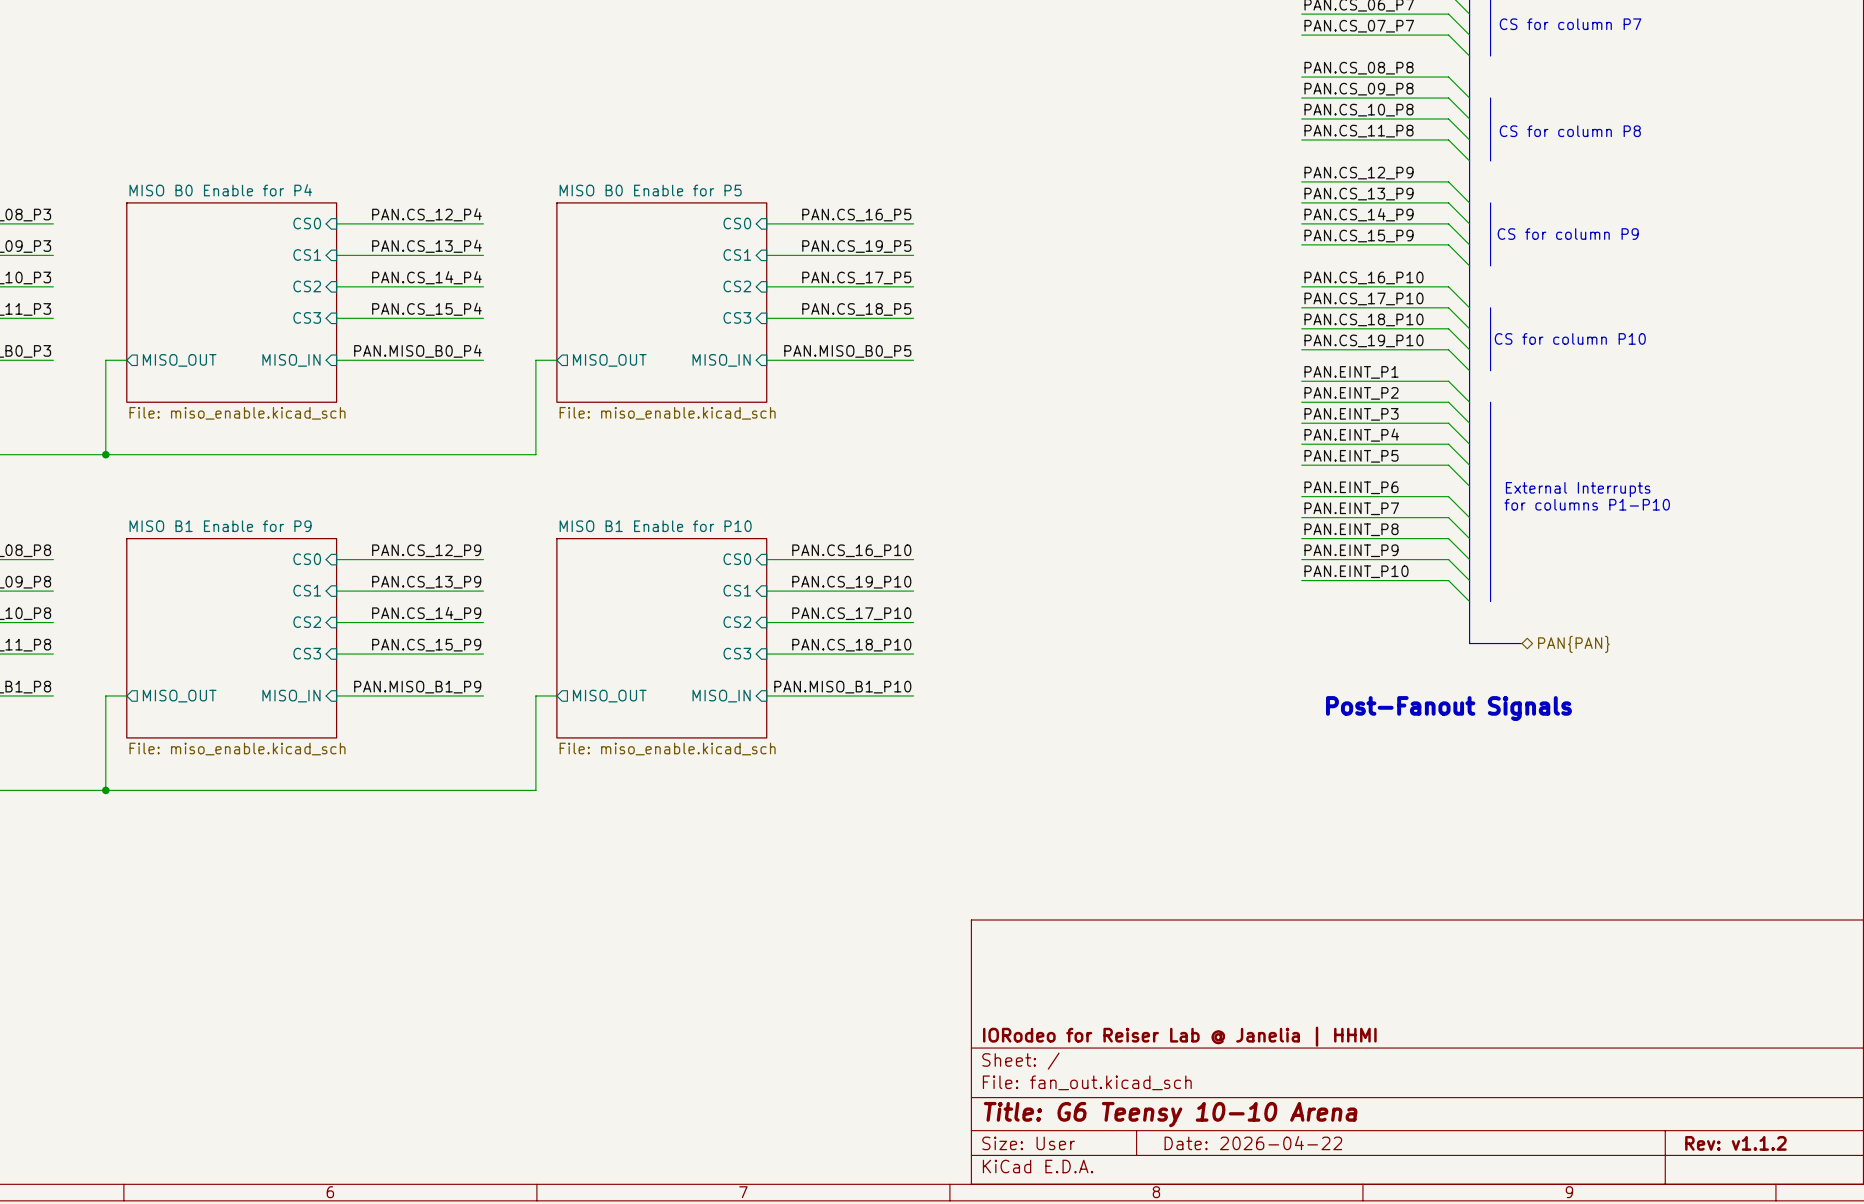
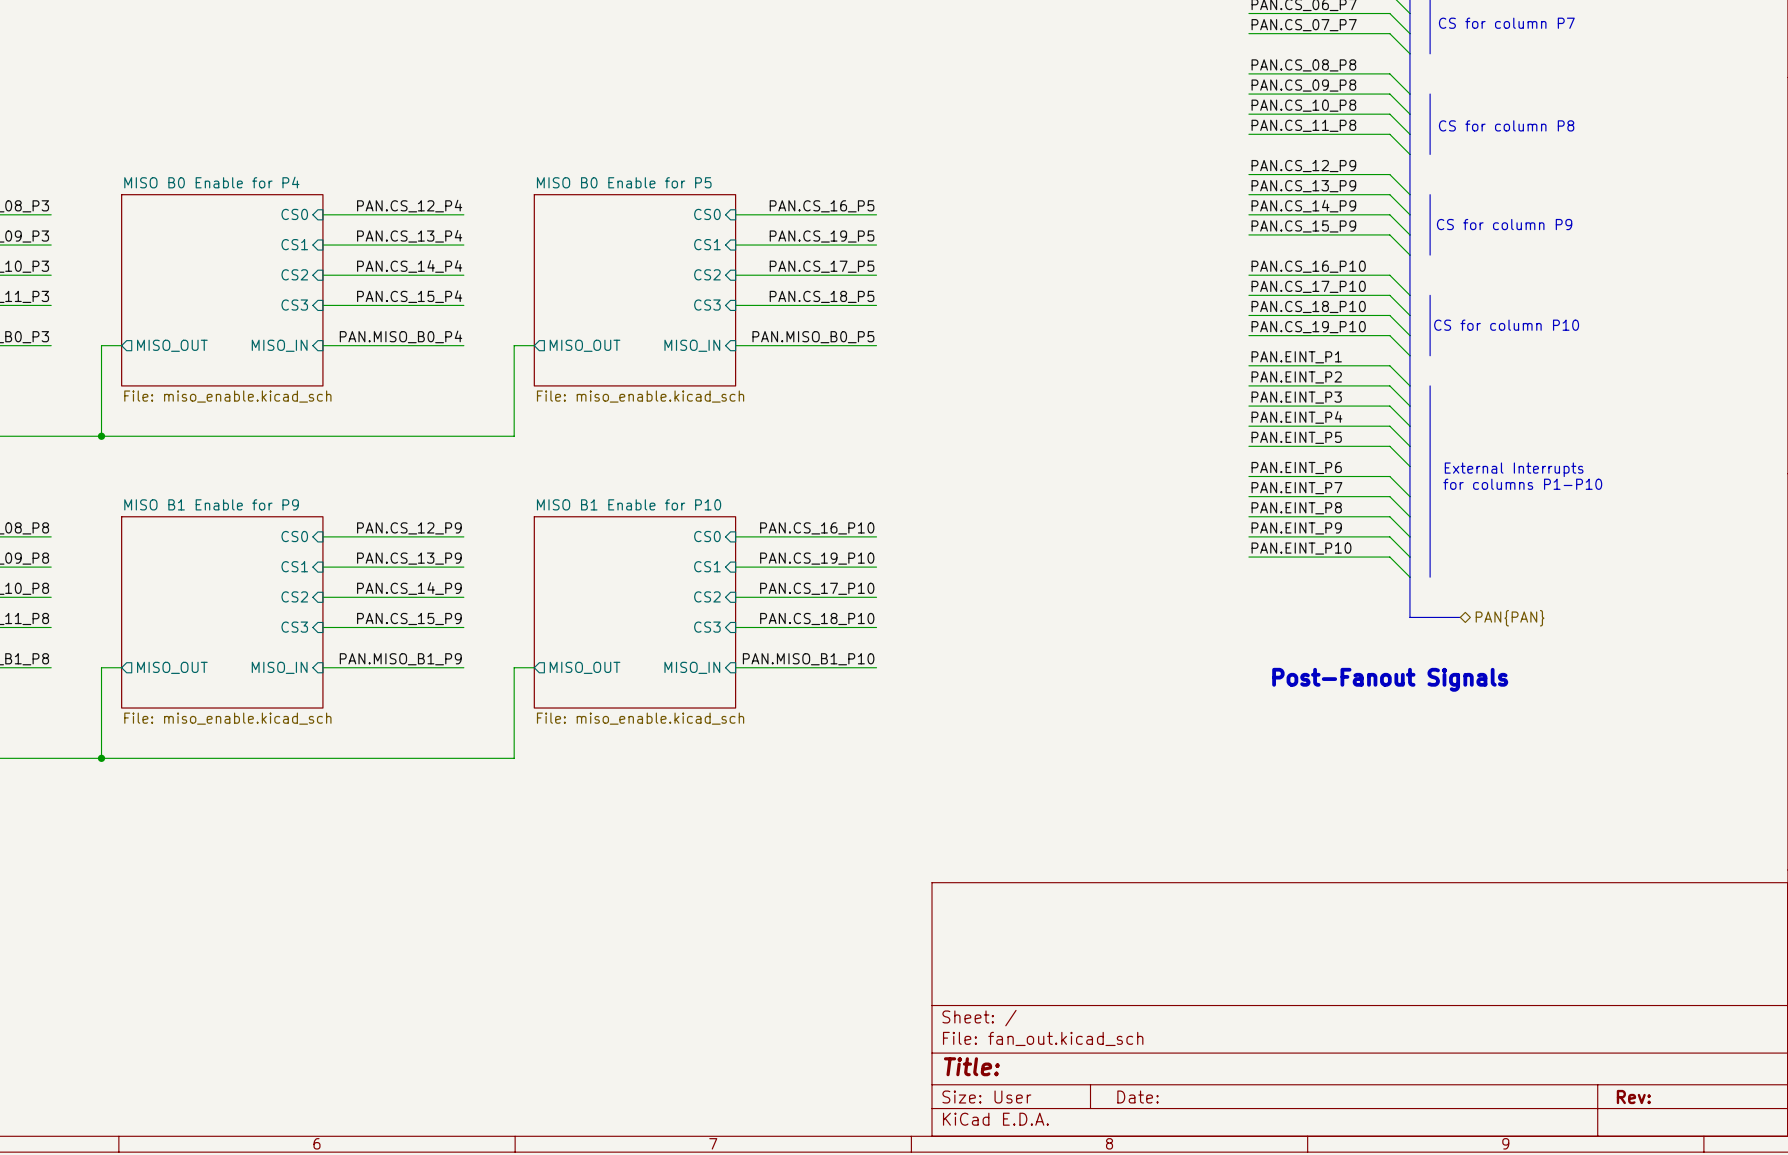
title block: IORodeo for Reiser Lab @ Janelia | HHMI (1179, 1036) -> none
title block: Title: G6 Teensy 10-10 Arena (1170, 1114) -> Title: (971, 1066)
title block: Date: 2026-04-22 (1253, 1143) -> Date: (1138, 1097)
title block: Rev: v1.1.2 (1735, 1143) -> Rev: (1633, 1097)

